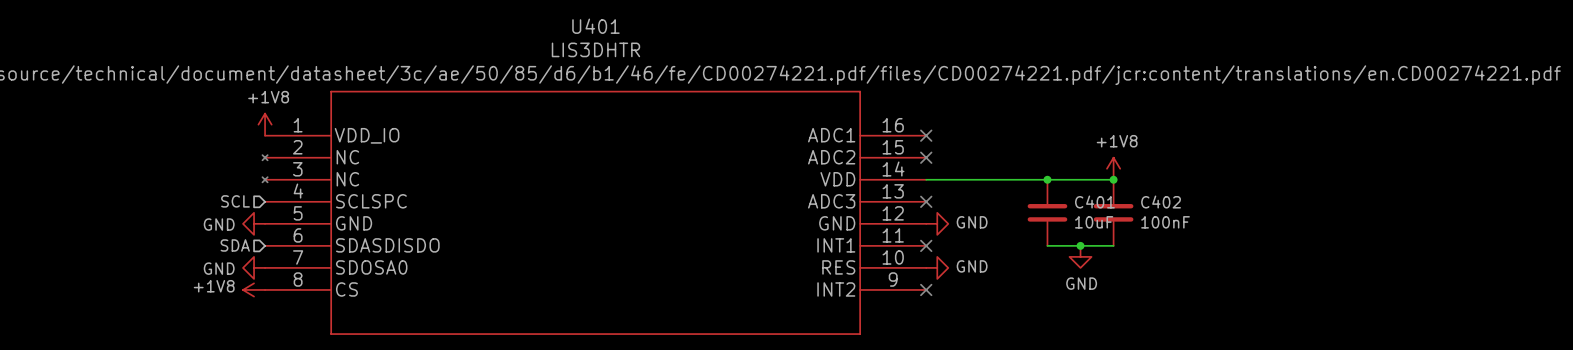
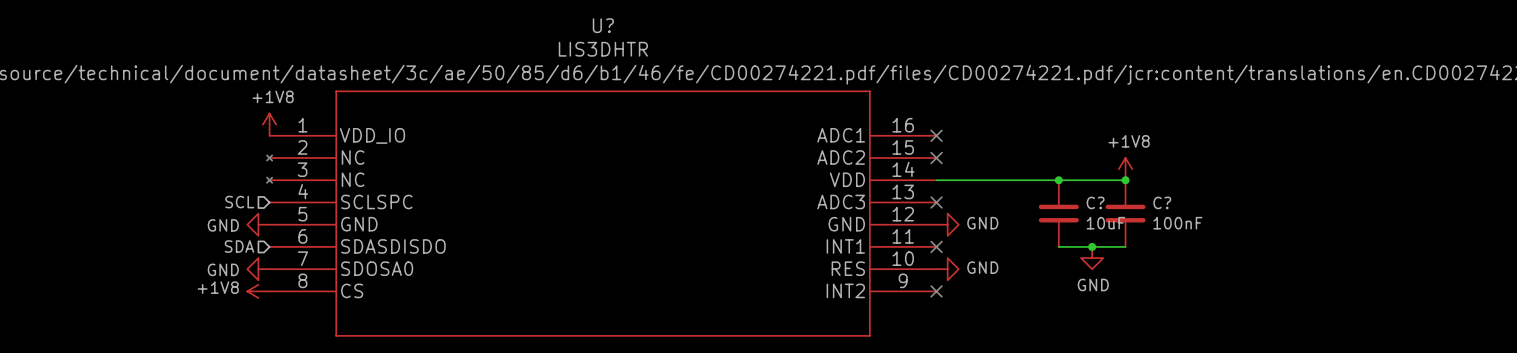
U401 name: U401 (595, 26) -> U? (603, 25)
C401 name: C401 (1094, 202) -> C? (1095, 202)
C402 name: C402 (1161, 202) -> C? (1162, 202)

